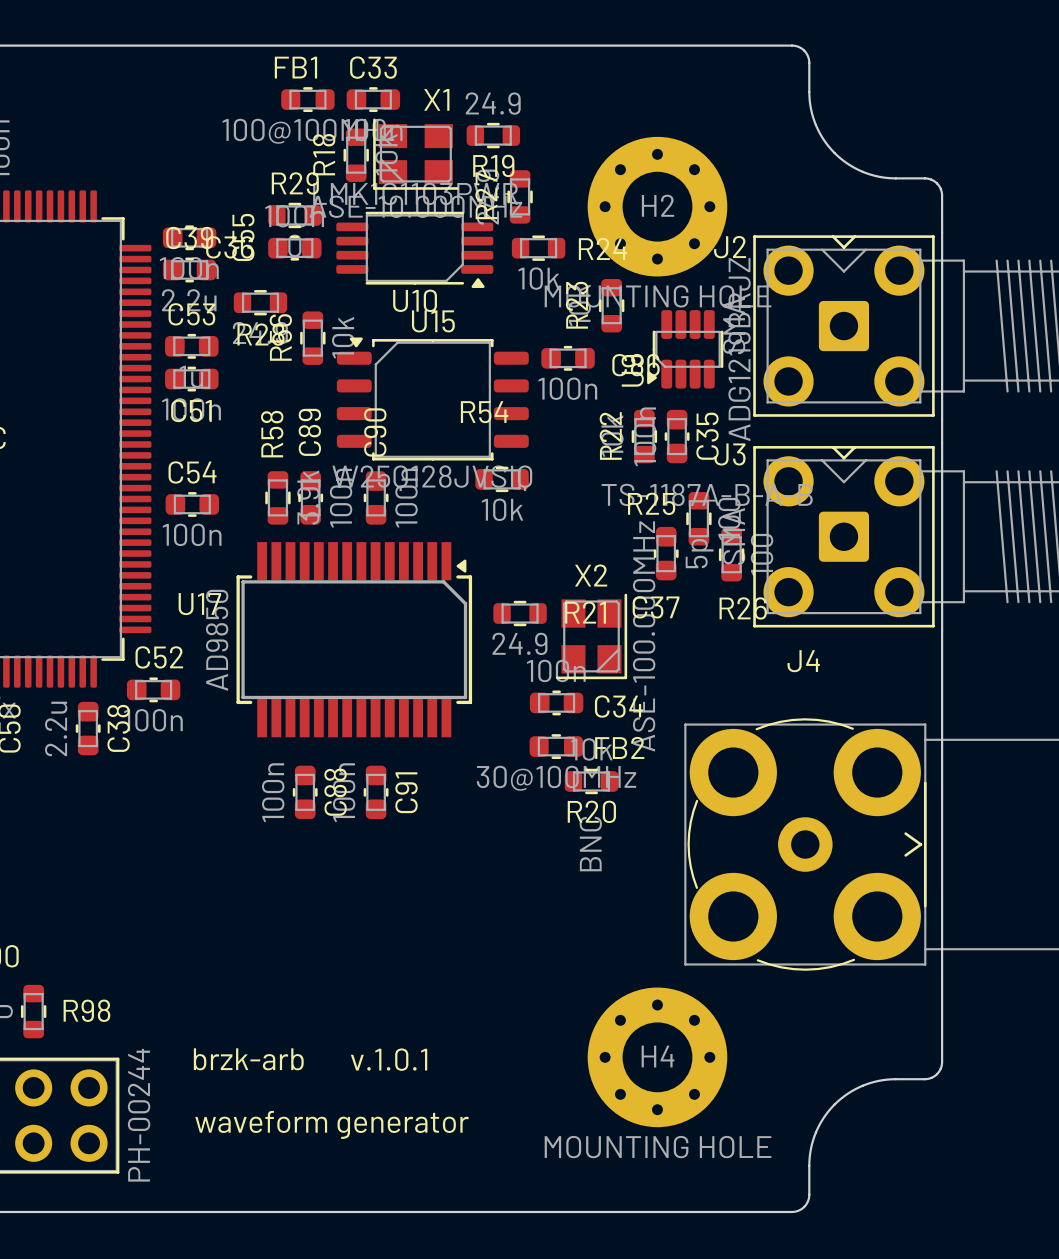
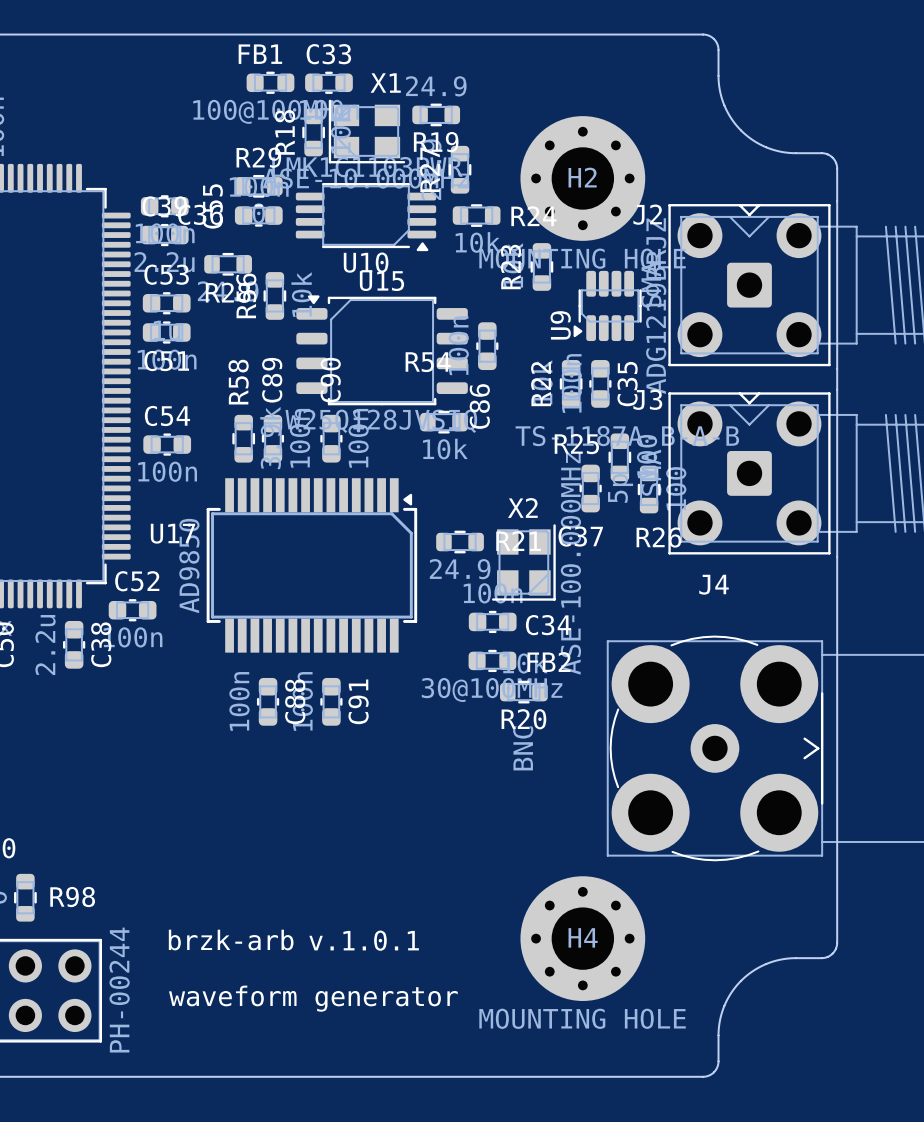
C86 rotation: 0° (568, 358) -> 90° clockwise (487, 346)
C86 position: (568, 358) -> (487, 346)

